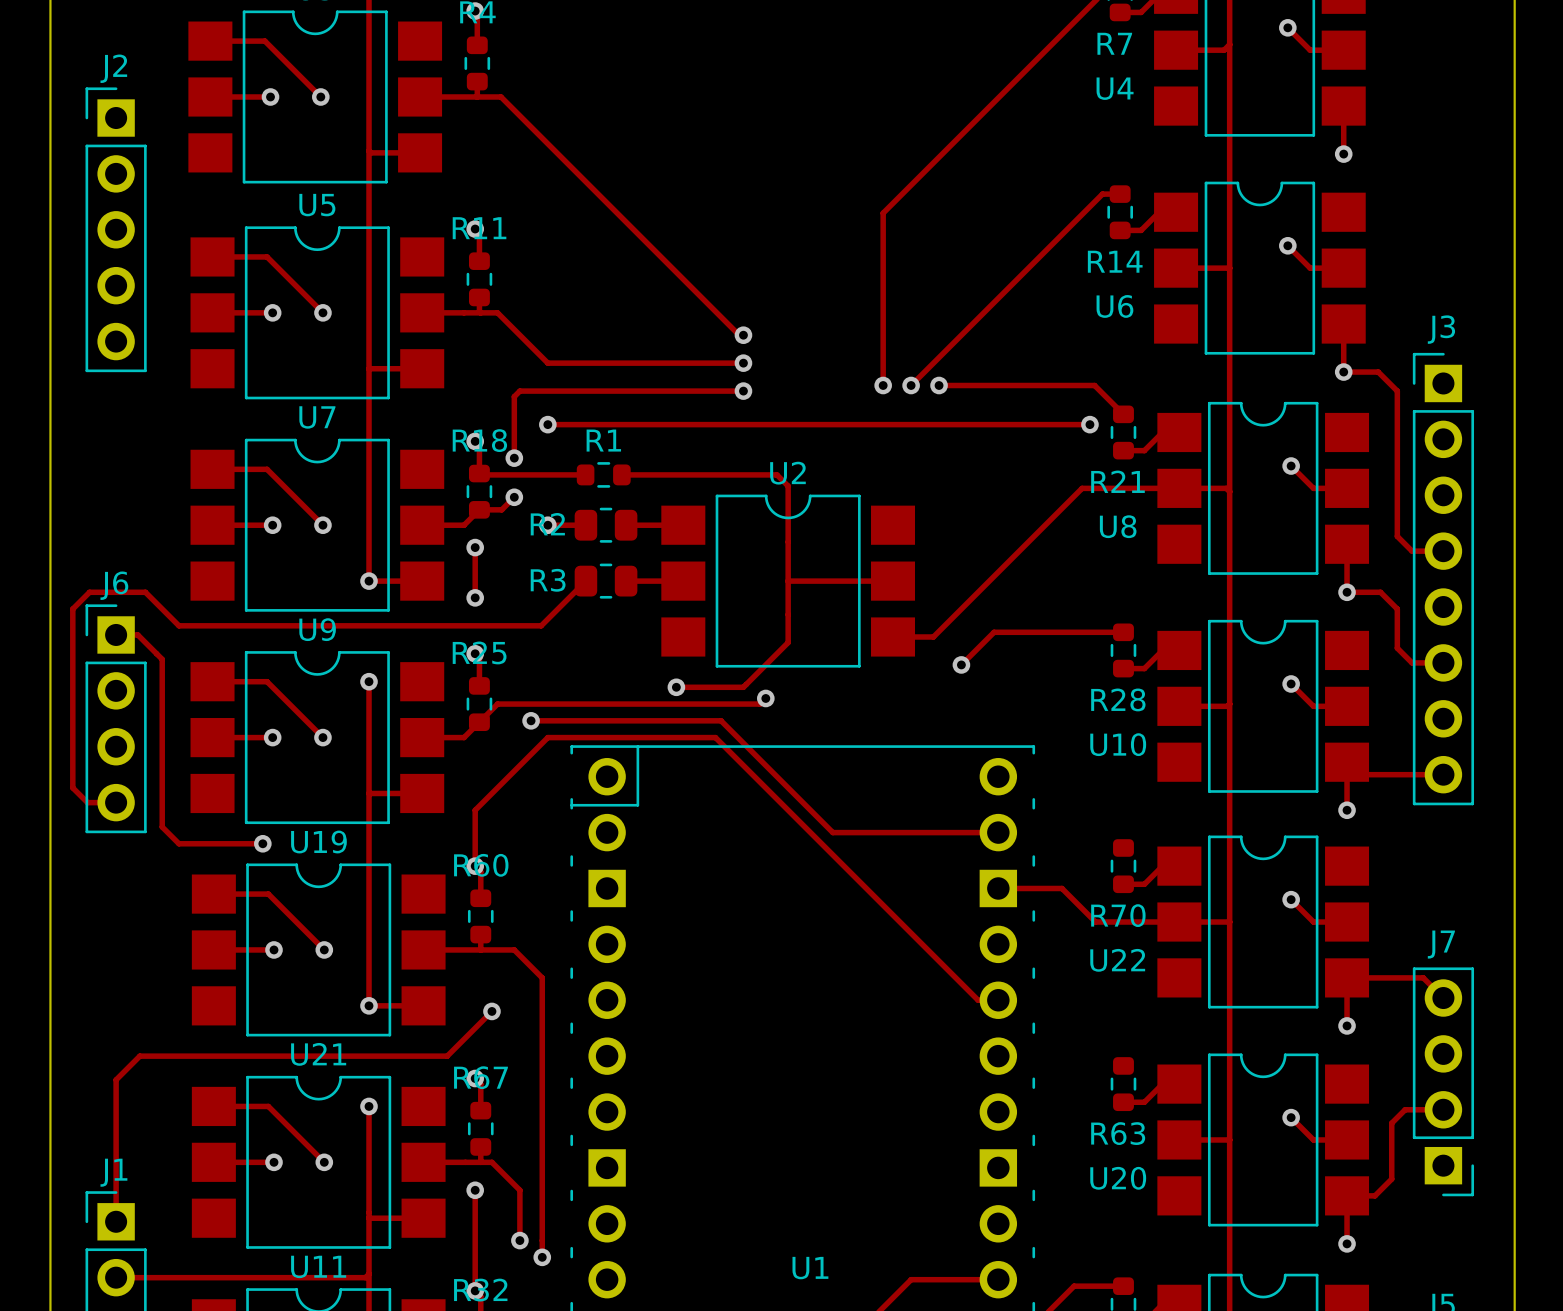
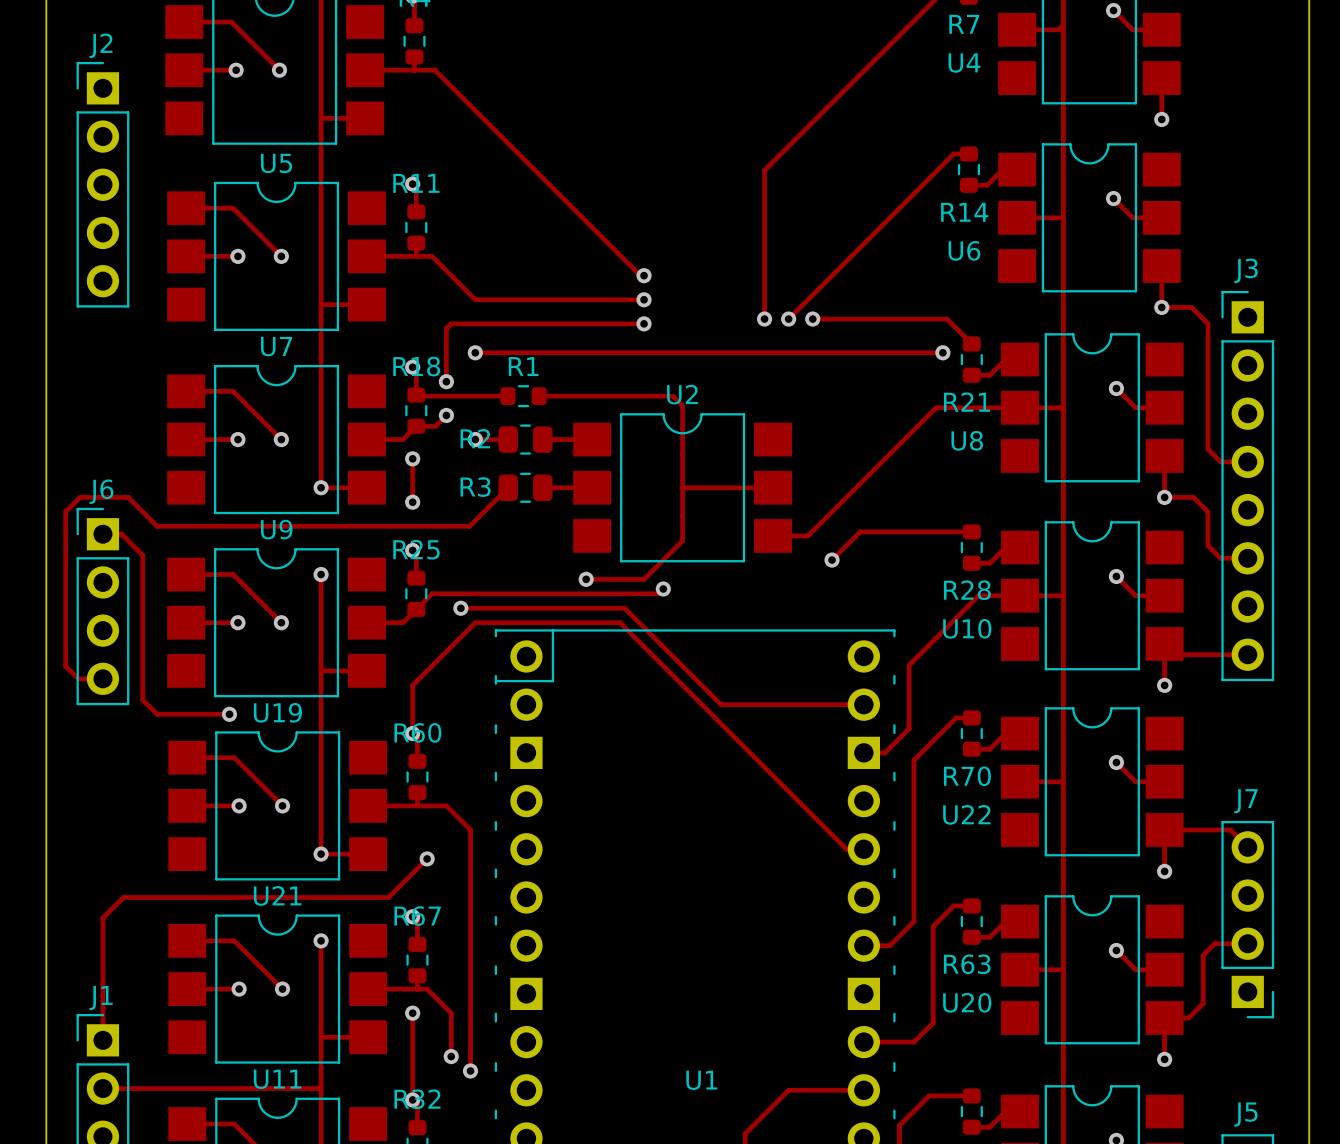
track: none -> (971, 717) (956, 717) (913, 760) (913, 921) (889, 945) (863, 945)
track: (1022, 888) (1062, 888) (1095, 922) (1179, 922) -> (885, 752) (909, 728) (909, 665) (978, 595) (1020, 595)
track: none -> (971, 905) (953, 905) (933, 926) (933, 1022) (913, 1042) (863, 1042)

